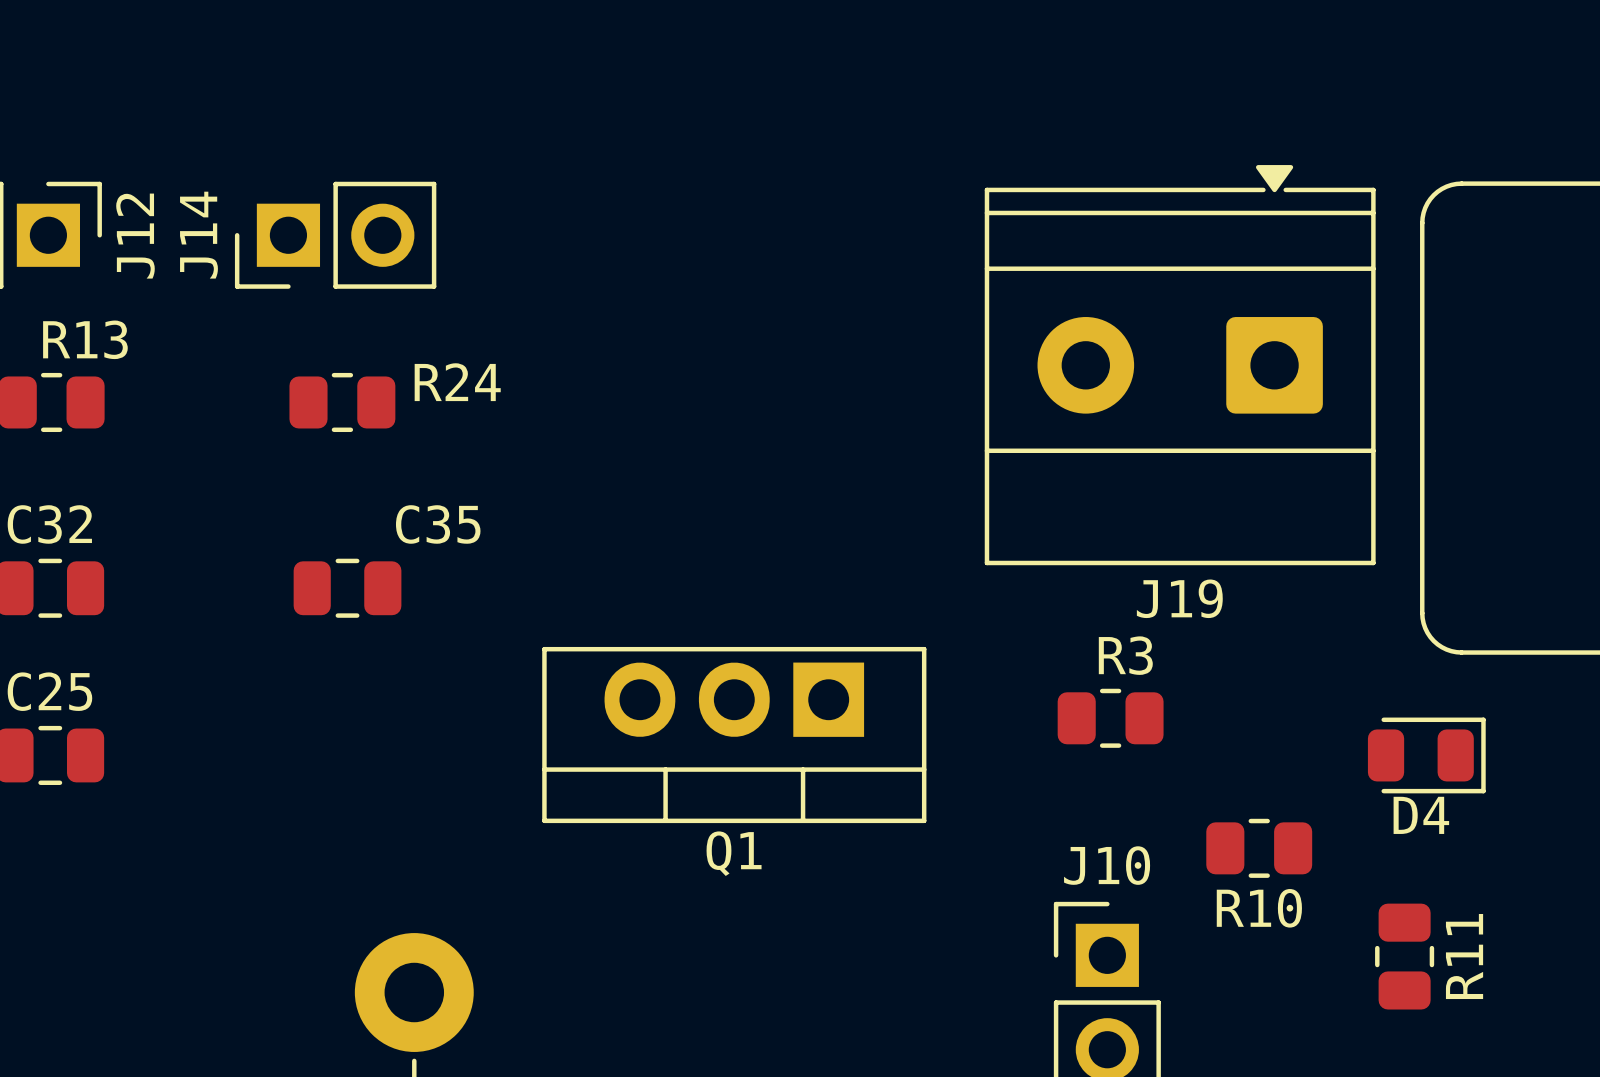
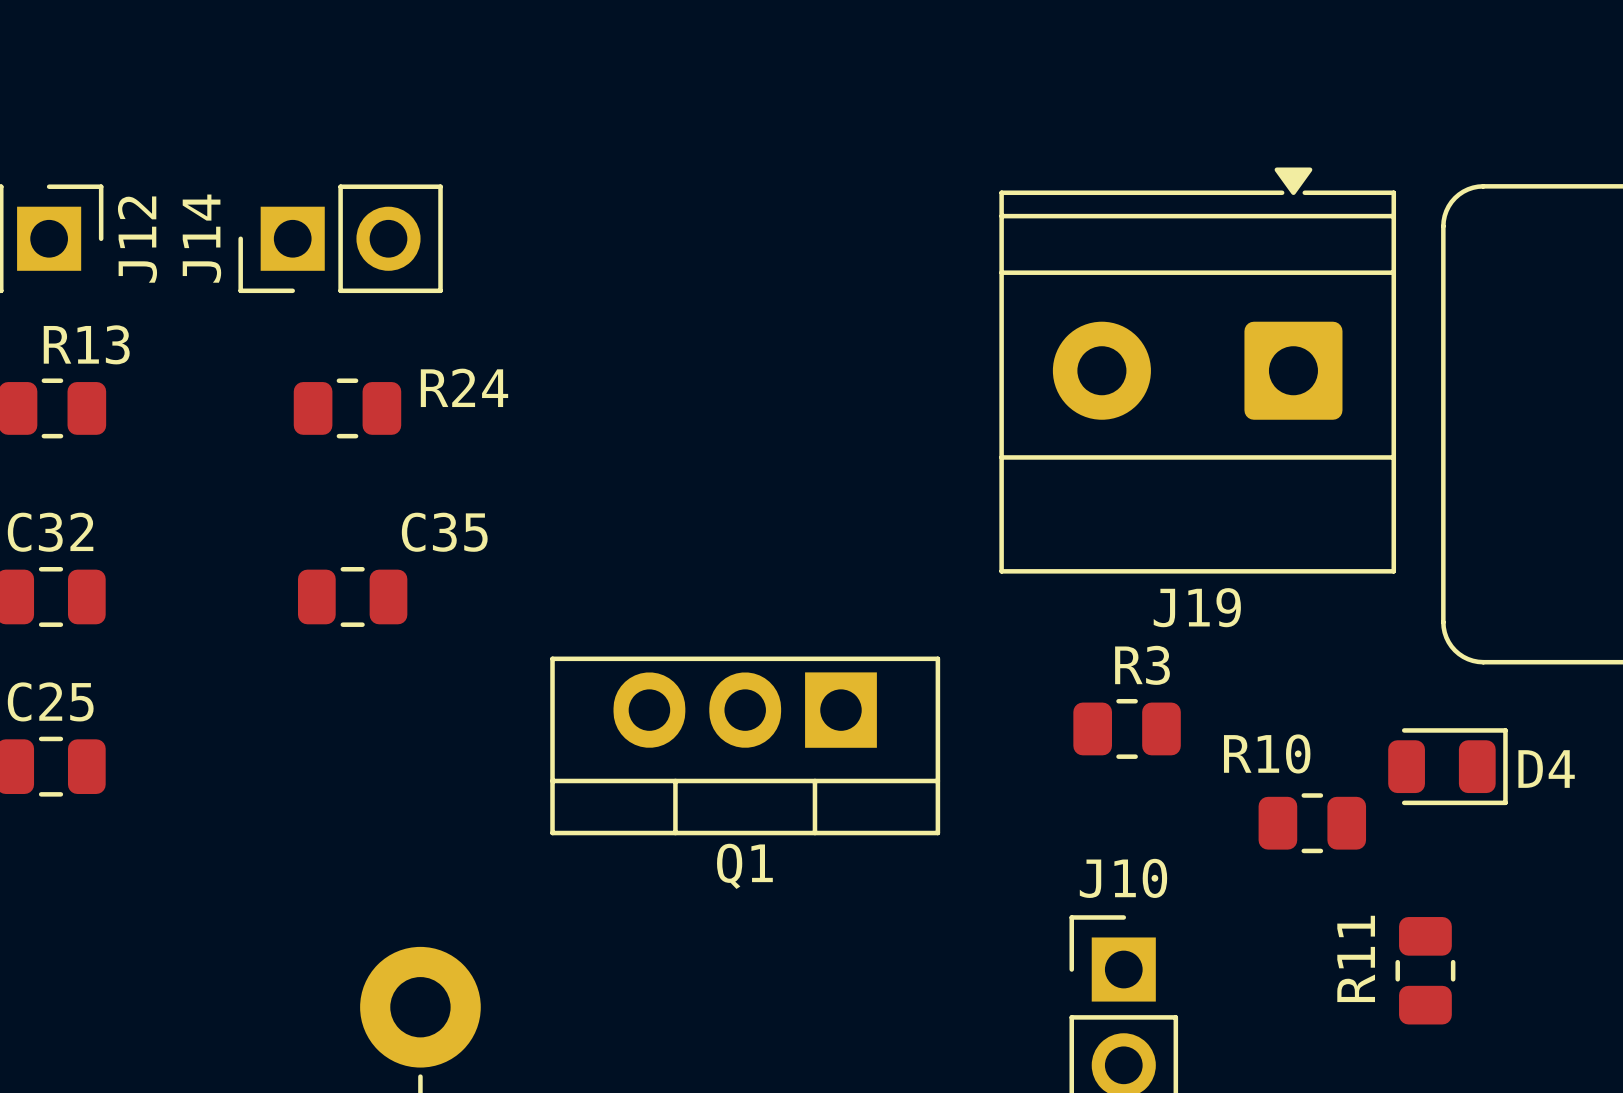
D4 name position: D4 (1421, 815) -> D4 (1546, 769)
R10 position: (1259, 848) -> (1312, 823)
R10 name position: R10 (1259, 908) -> R10 (1267, 753)
R11 name position: R11 (1464, 956) -> R11 (1356, 958)

